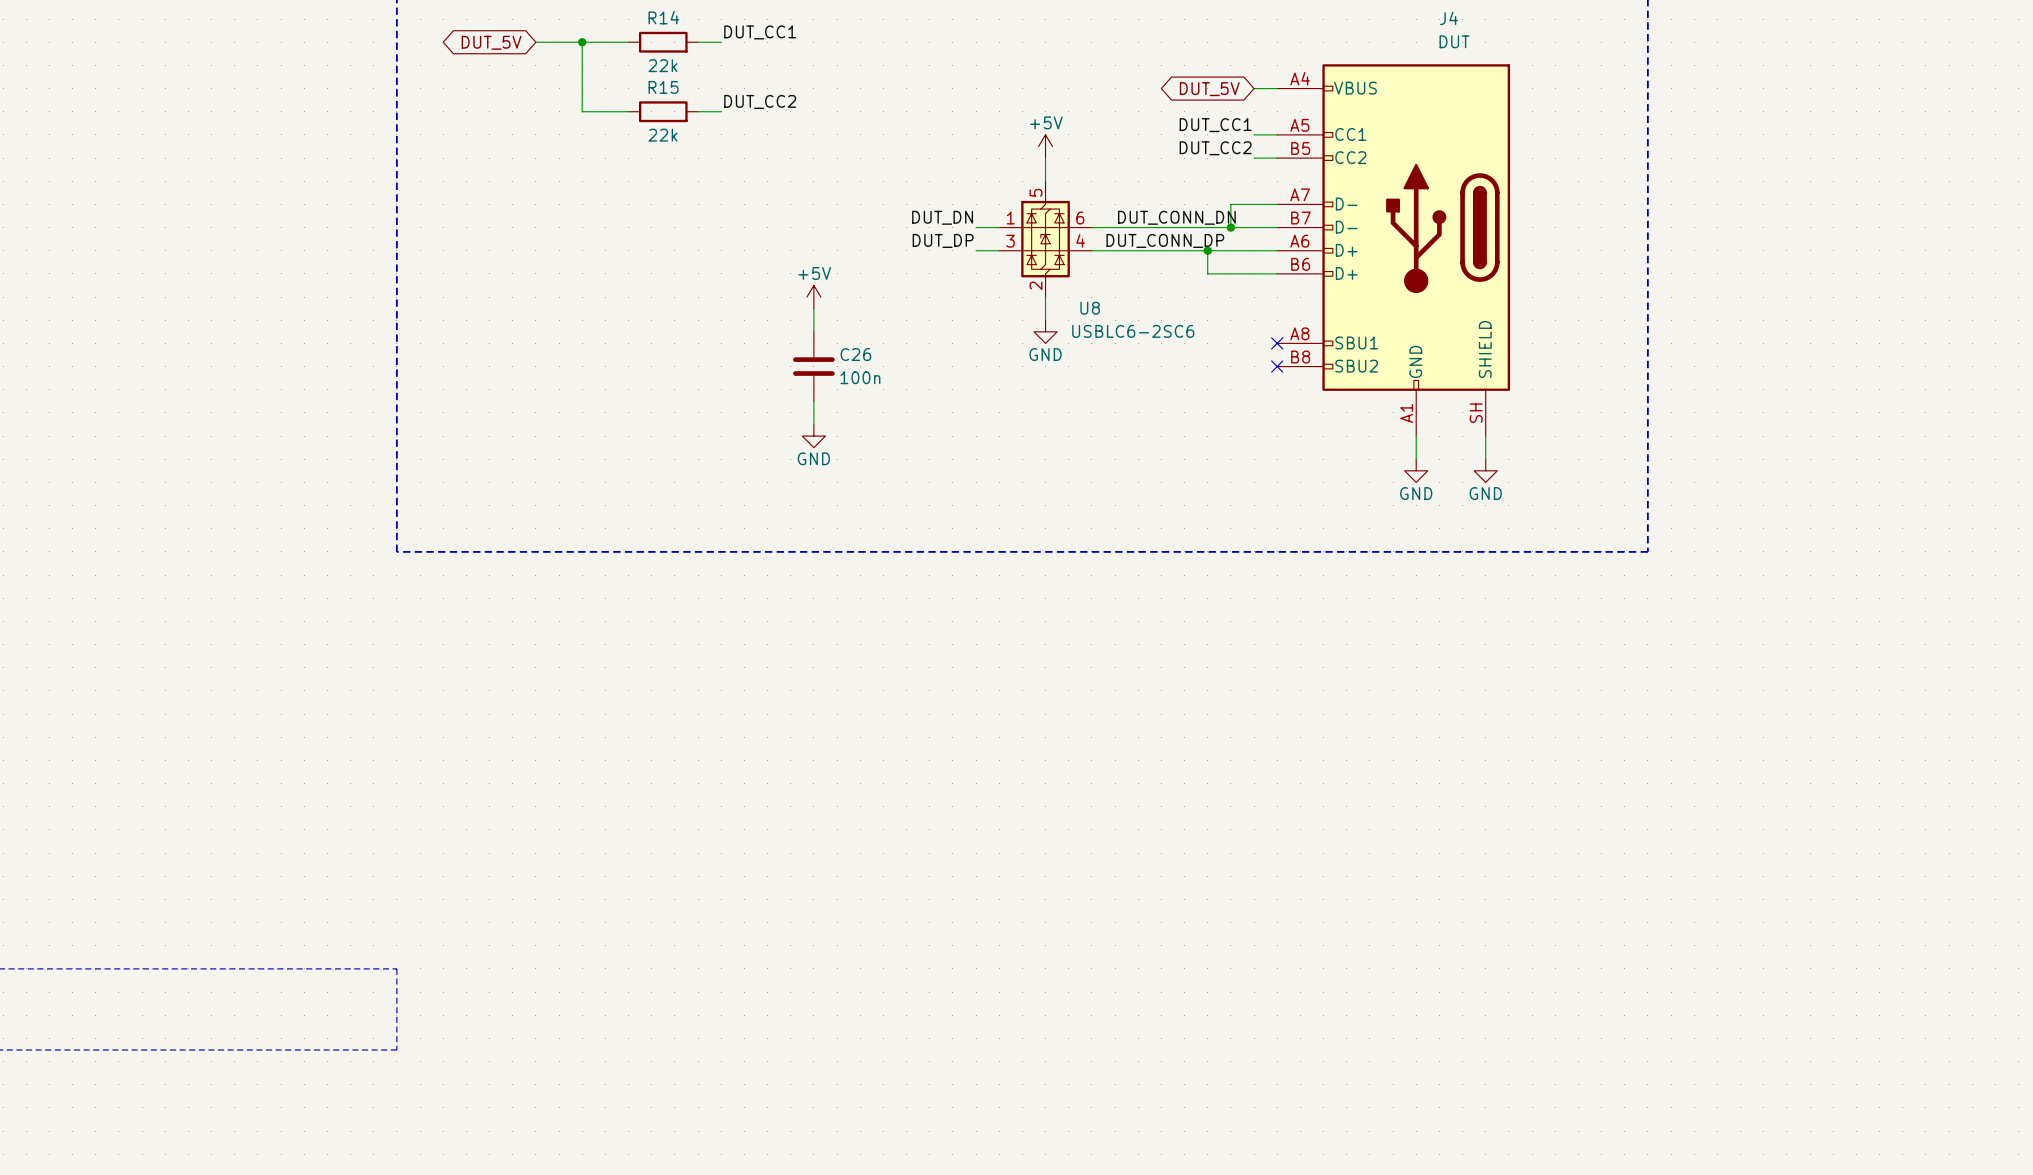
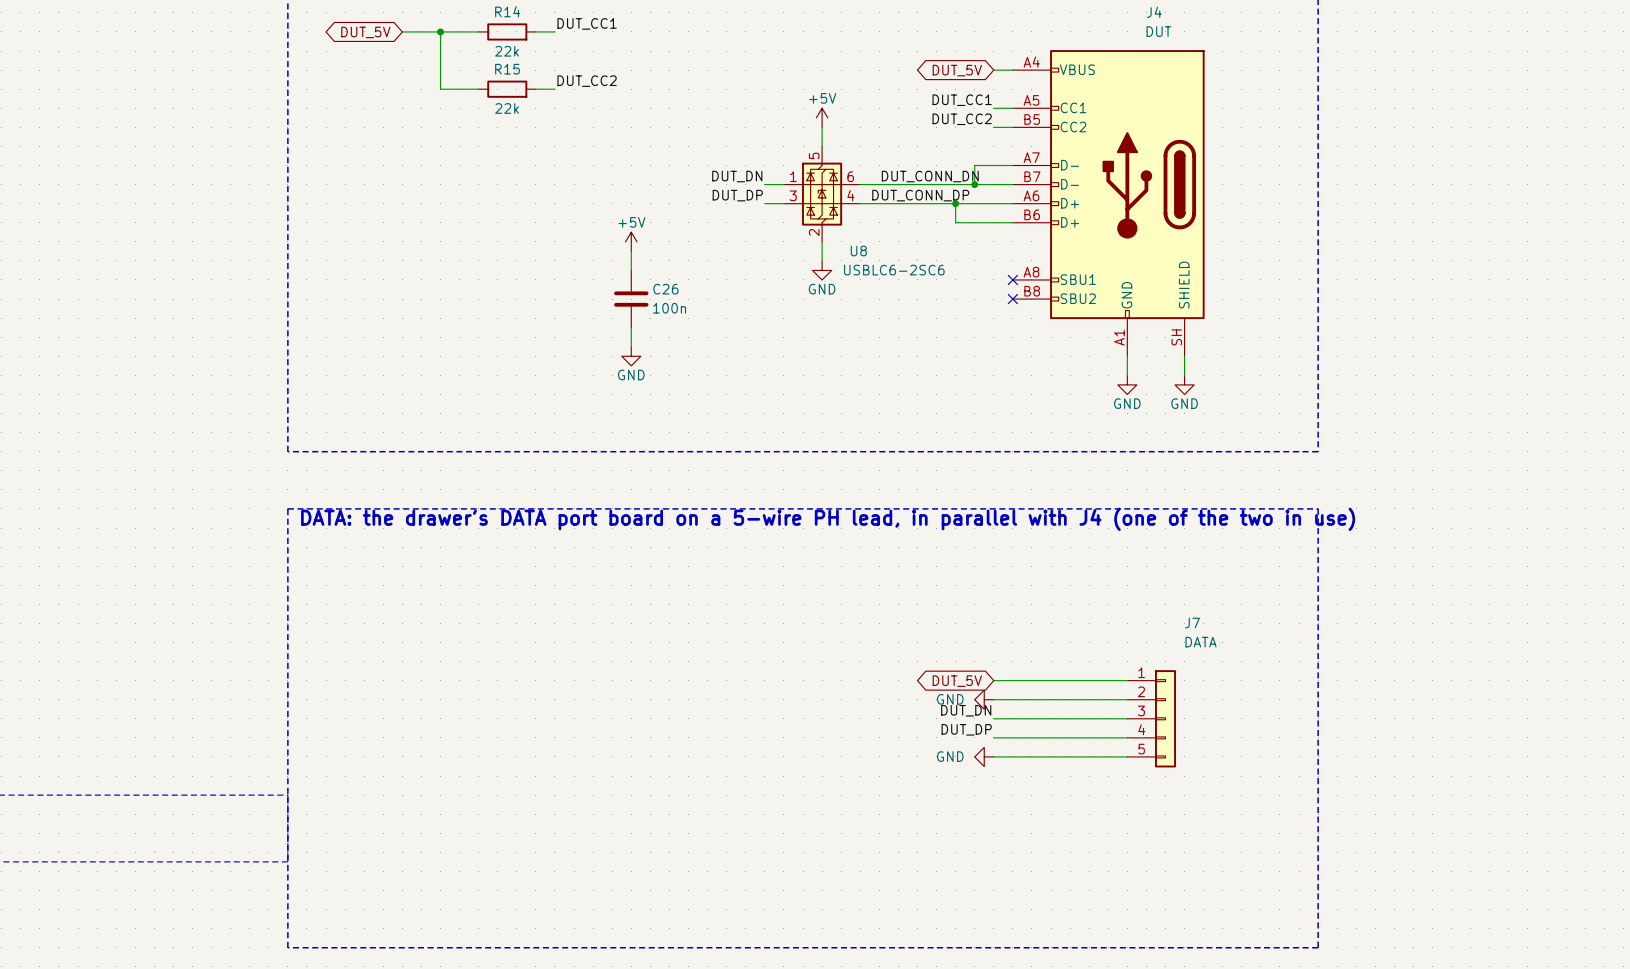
line: none -> (287, 508) (1318, 508) (1318, 947) (287, 947) (287, 508)
text: none -> DATA: the drawer's DATA port board on a 5-wire PH lead, in parallel with J4 (one of the two in use) (828, 519)
wire: none -> (993, 680) (1127, 680)
global label: none -> DUT_5V (957, 681)
power symbol: none -> GND (984, 699)
wire: none -> (993, 699) (1127, 699)
label: none -> DUT_DN (966, 710)
wire: none -> (993, 718) (1127, 718)
J7: none -> DATA (1151, 718)
label: none -> DUT_DP (966, 729)
wire: none -> (993, 737) (1127, 737)
power symbol: none -> GND (984, 756)
wire: none -> (993, 756) (1127, 756)

